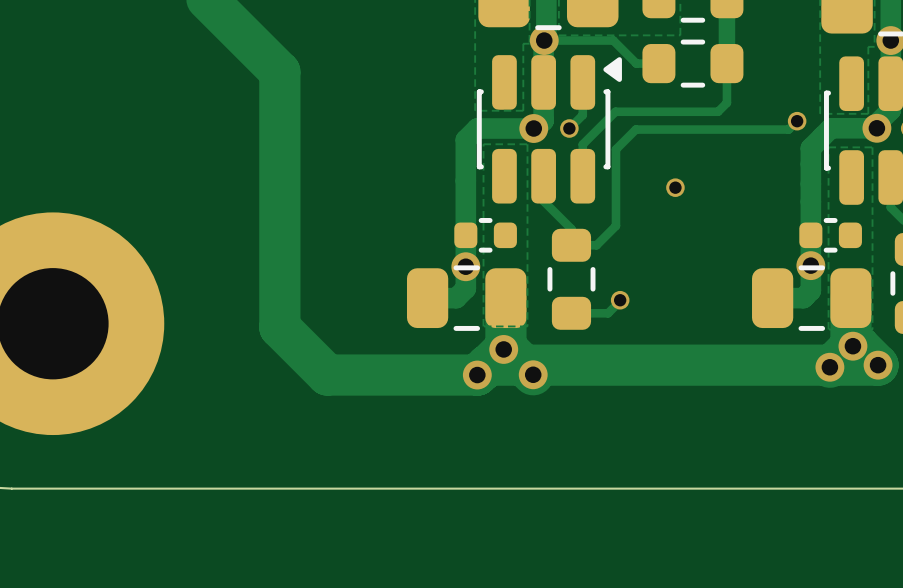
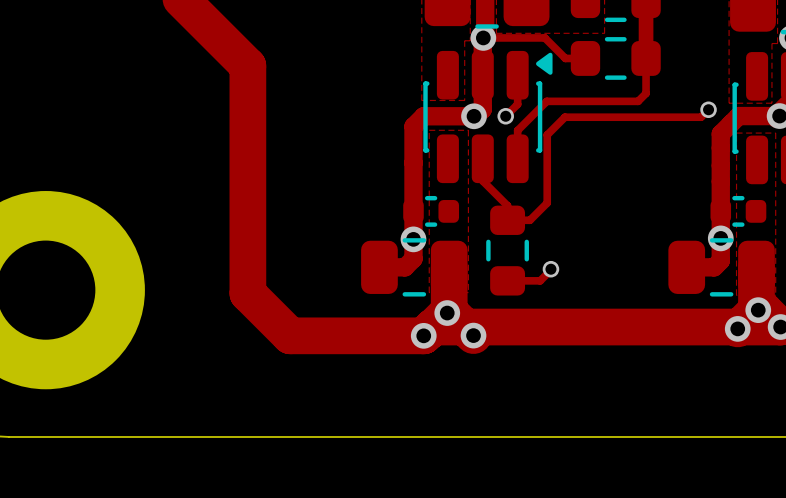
via: (675, 187) -> none

